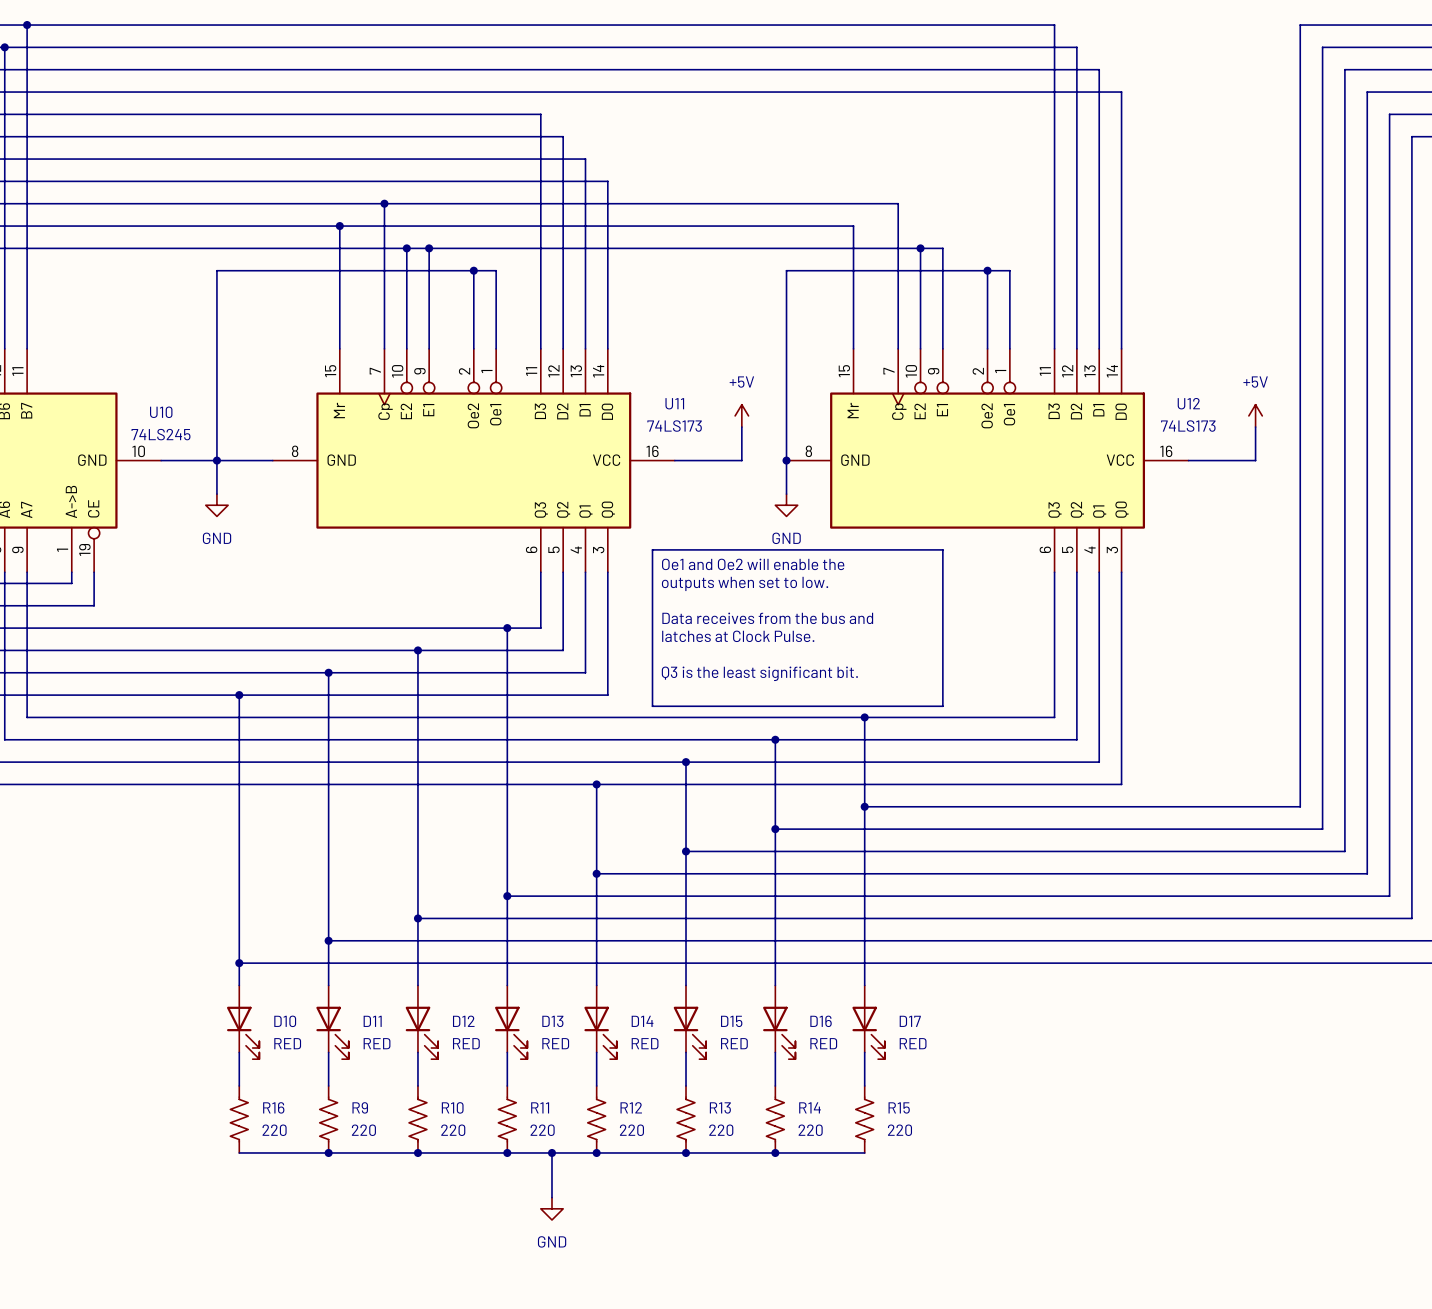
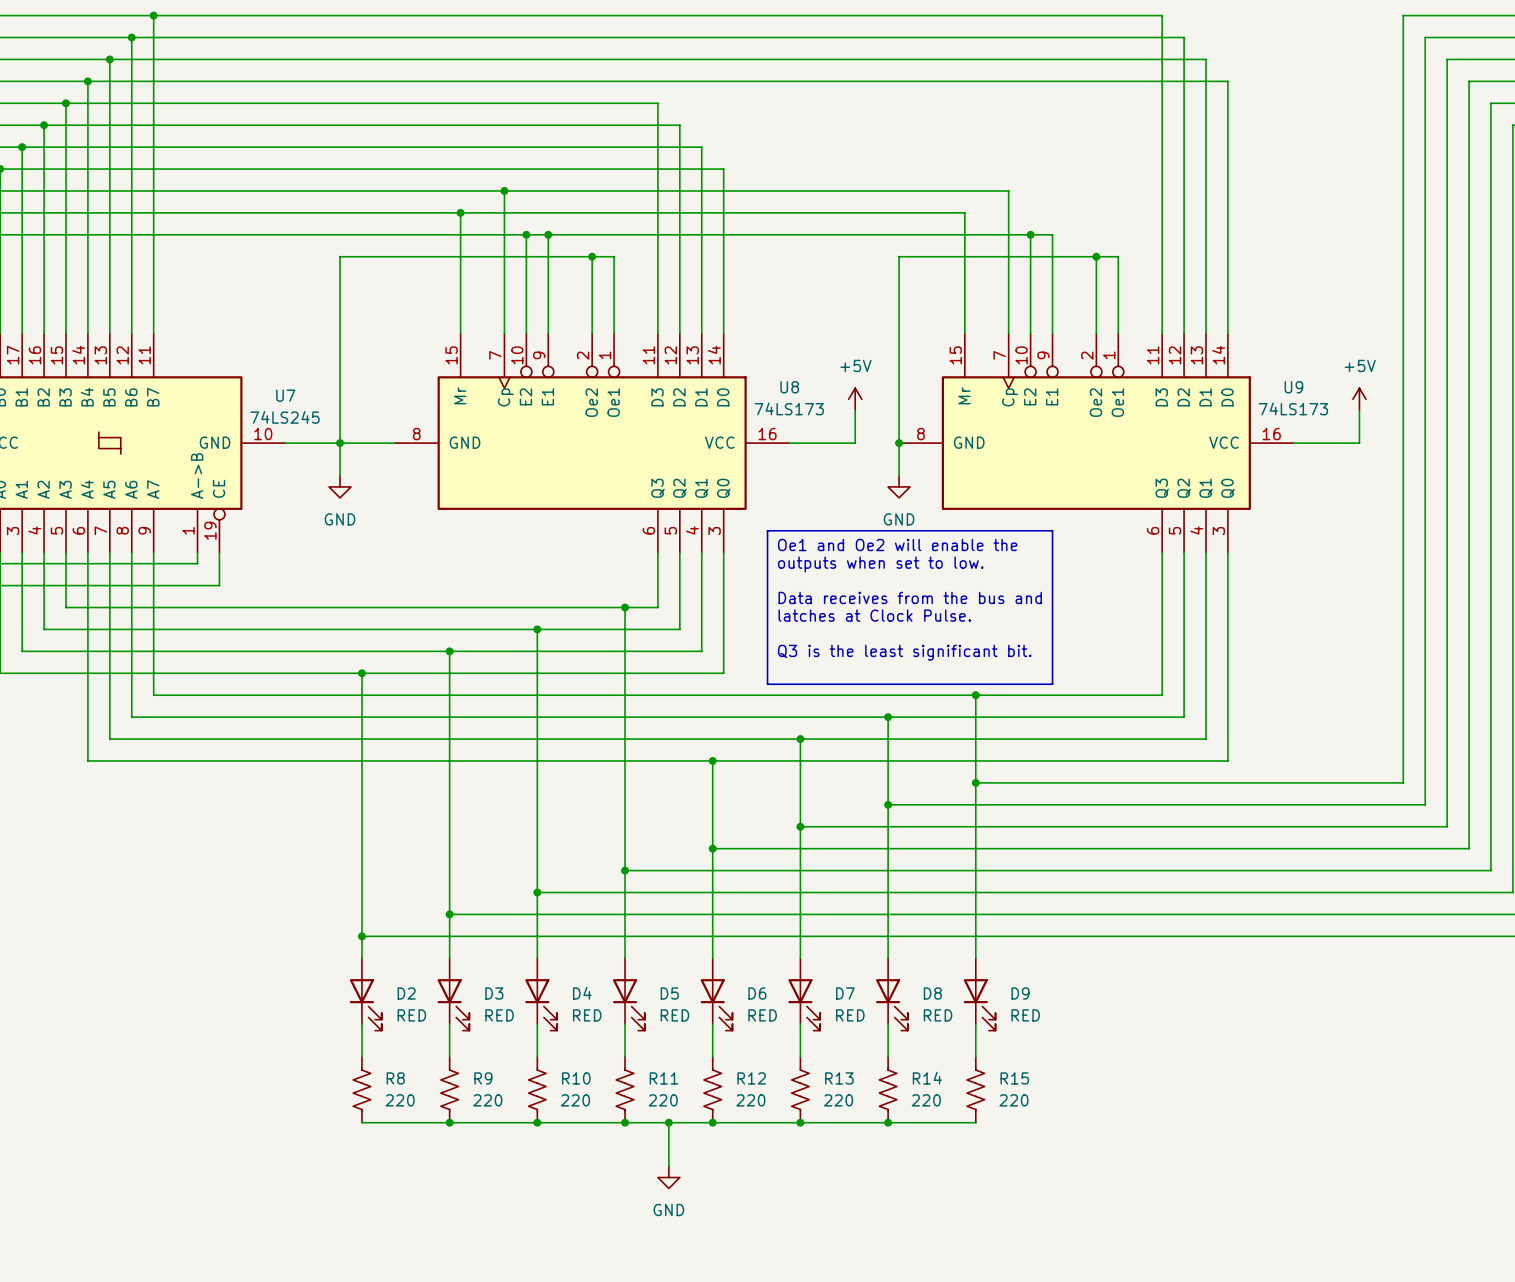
U11 name: U11 (674, 403) -> U8 (789, 387)
U12 name: U12 (1188, 403) -> U9 (1293, 387)
U10 name: U10 (161, 412) -> U7 (285, 395)
D10 name: D10 (285, 1021) -> D2 (406, 993)
D11 name: D11 (372, 1021) -> D3 (494, 993)
D12 name: D12 (463, 1021) -> D4 (582, 993)
D13 name: D13 (552, 1021) -> D5 (669, 993)
D14 name: D14 (642, 1021) -> D6 (757, 993)
D15 name: D15 (731, 1021) -> D7 (845, 993)
D16 name: D16 (821, 1021) -> D8 (932, 993)
D17 name: D17 (910, 1021) -> D9 (1020, 993)
R16 name: R16 (273, 1107) -> R8 (395, 1078)

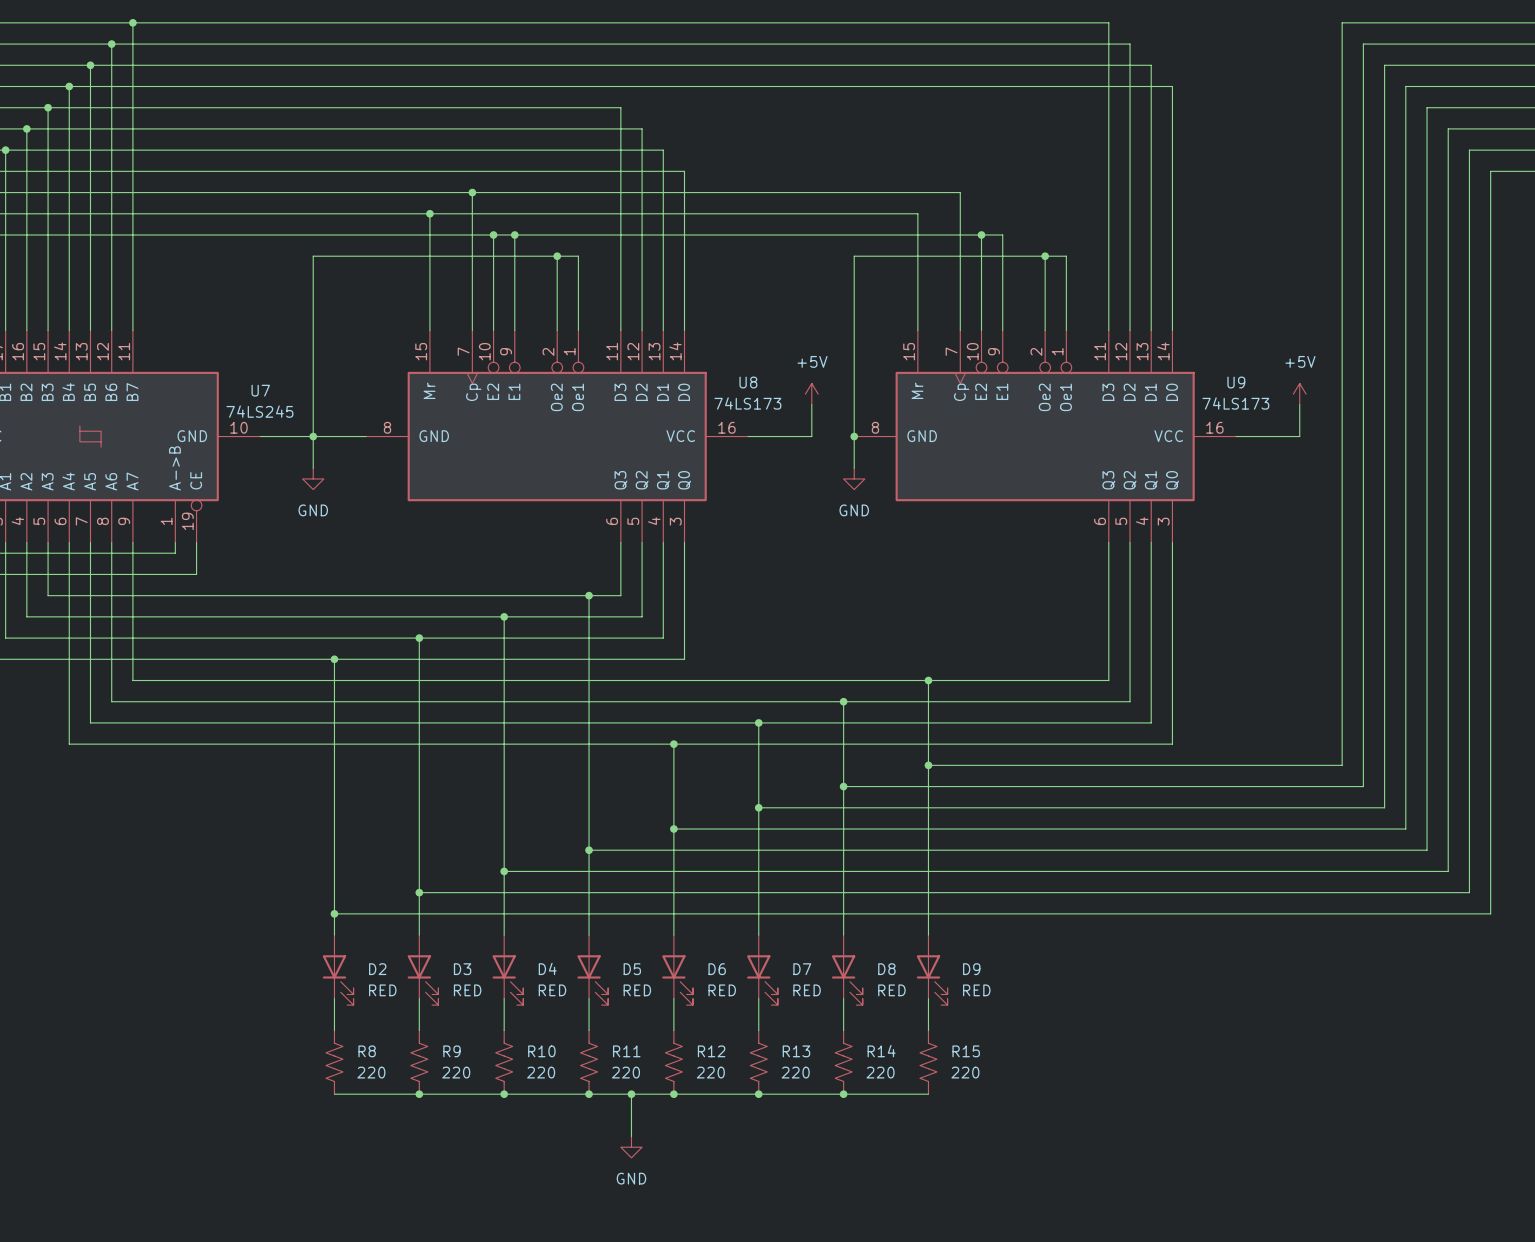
line: (767, 530) (1052, 530) (1052, 684) (767, 684) (767, 530) -> none
text: Oe1 and Oe2 will enable the (897, 545) -> none
text: outputs when set to low. (880, 564) -> none
text: Data receives from the bus and (910, 597) -> none
text: latches at Clock Pulse. (874, 615) -> none
text: Q3 is the least significant bit. (904, 652) -> none

